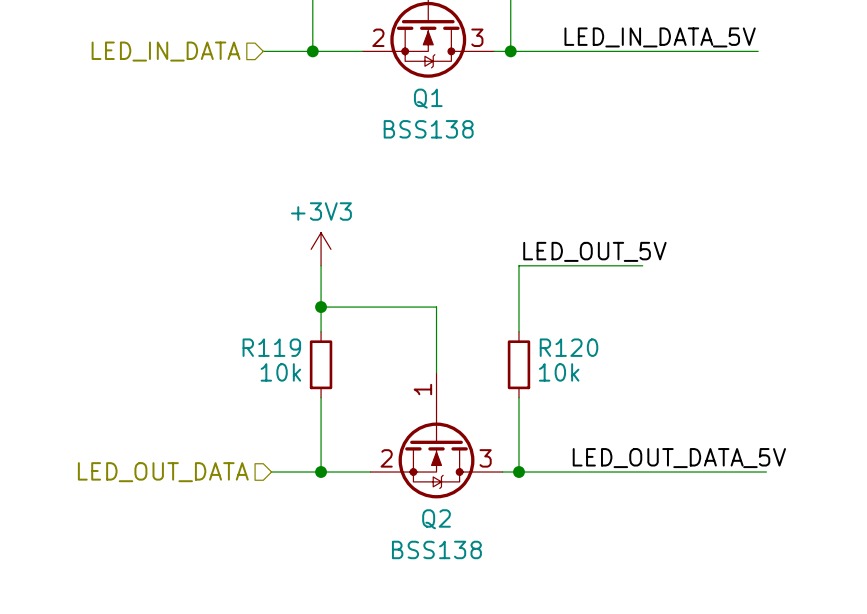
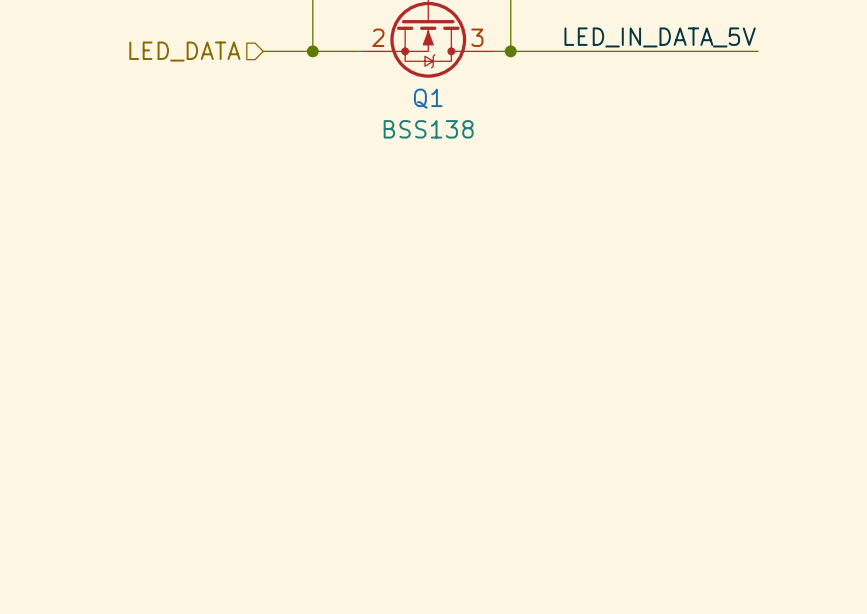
hierarchical label: LED_IN_DATA (166, 51) -> LED_DATA (184, 51)
power symbol: +3V3 (321, 249) -> none
label: LED_OUT_5V (594, 251) -> none
wire: (321, 265) (321, 331) -> none
wire: (642, 265) (518, 265) (518, 331) -> none
wire: (321, 307) (436, 307) (436, 373) -> none
junction: (321, 307) -> none
R119: 10k (321, 364) -> none
R120: 10k (518, 364) -> none
wire: (321, 397) (321, 472) -> none
wire: (518, 397) (518, 472) -> none
Q2: BSS138 (436, 435) -> none
label: LED_OUT_DATA_5V (679, 458) -> none
hierarchical label: LED_OUT_DATA (163, 472) -> none
wire: (271, 472) (370, 472) -> none
junction: (321, 472) -> none
wire: (502, 472) (766, 472) -> none
junction: (518, 472) -> none

